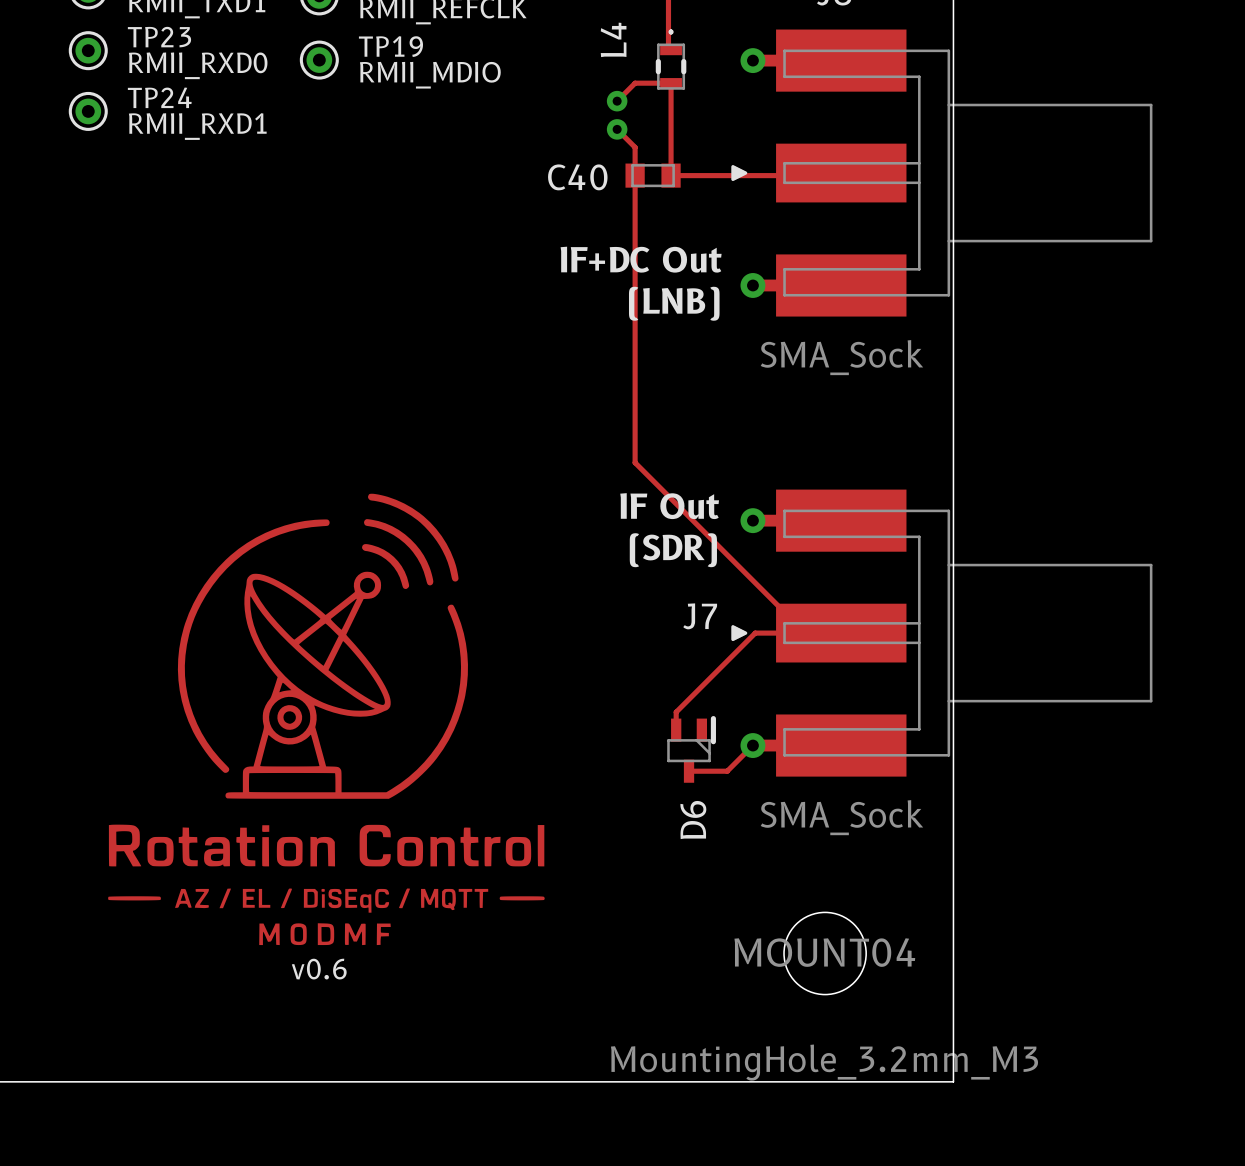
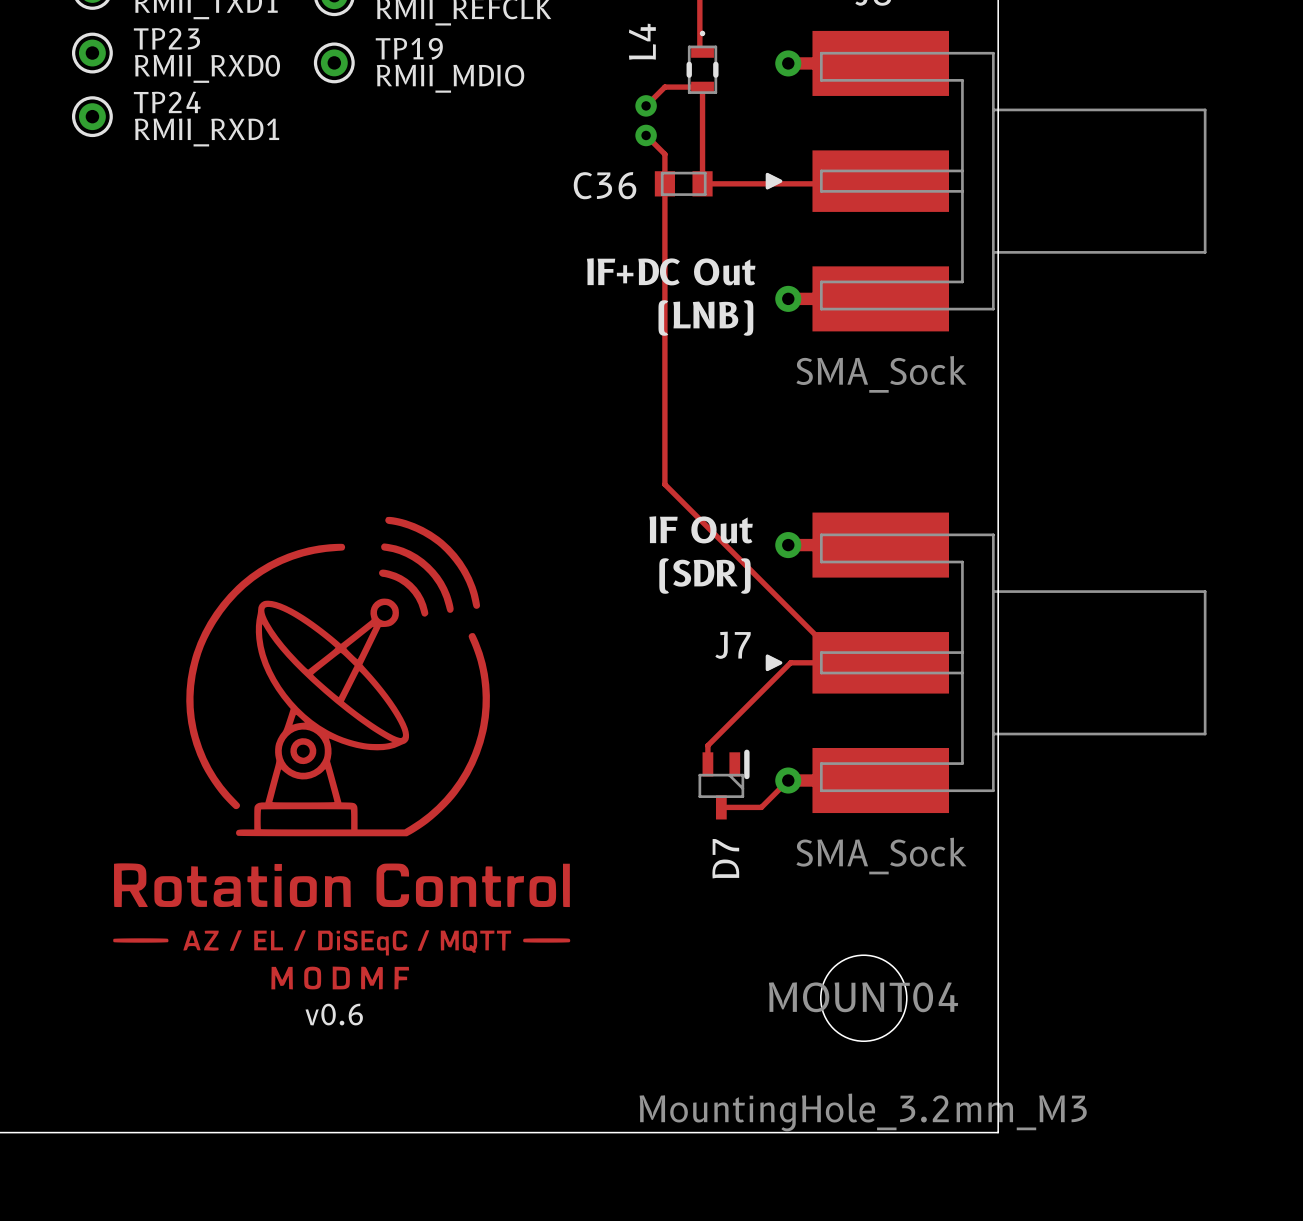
C40 name: C40 (577, 177) -> C36 (605, 185)
D6 name: D6 (693, 820) -> D7 (725, 858)

